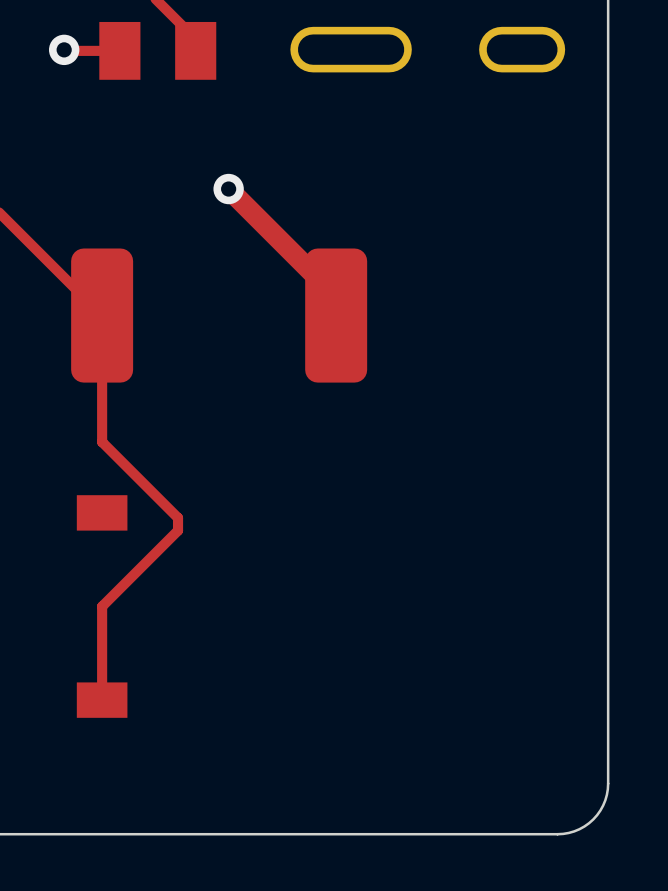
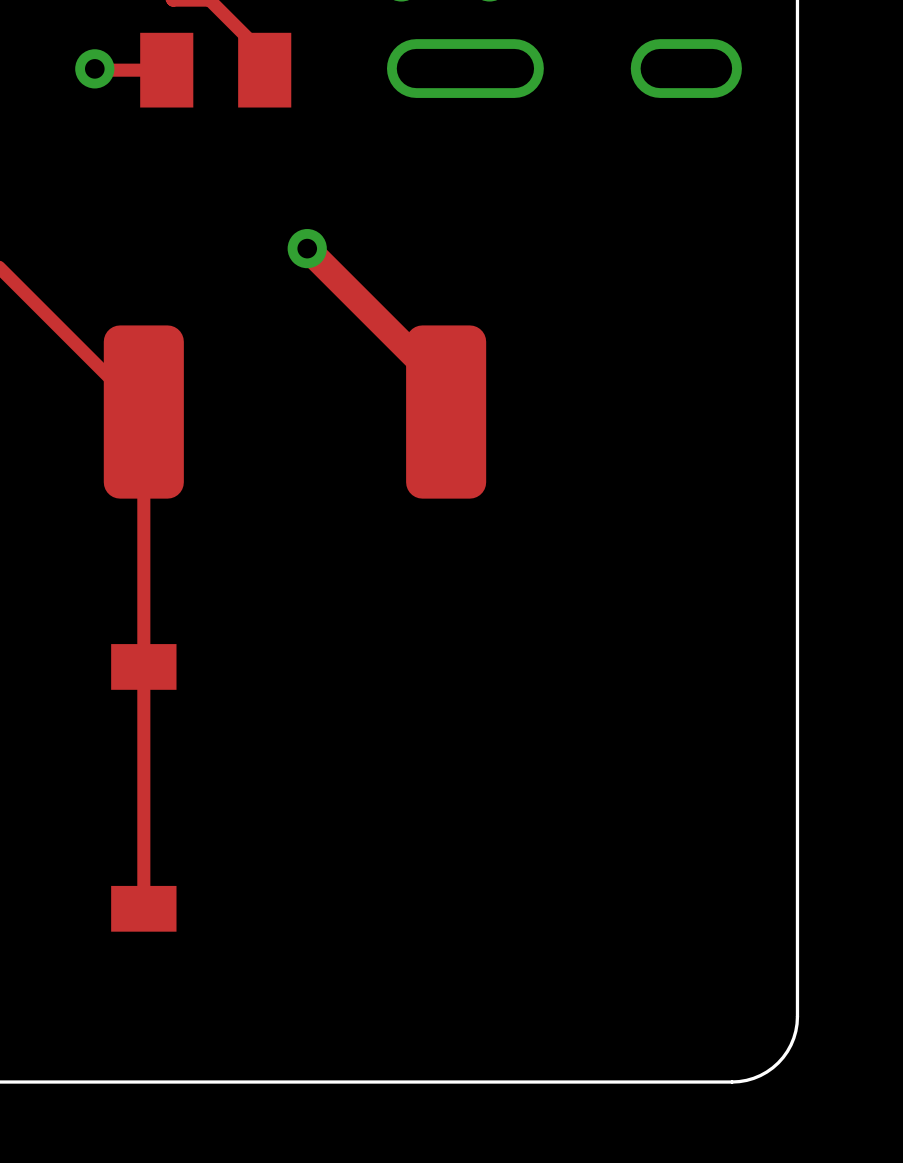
top track: (102, 442) (178, 517) (178, 530) (102, 606) -> (143, 575) (143, 787)

